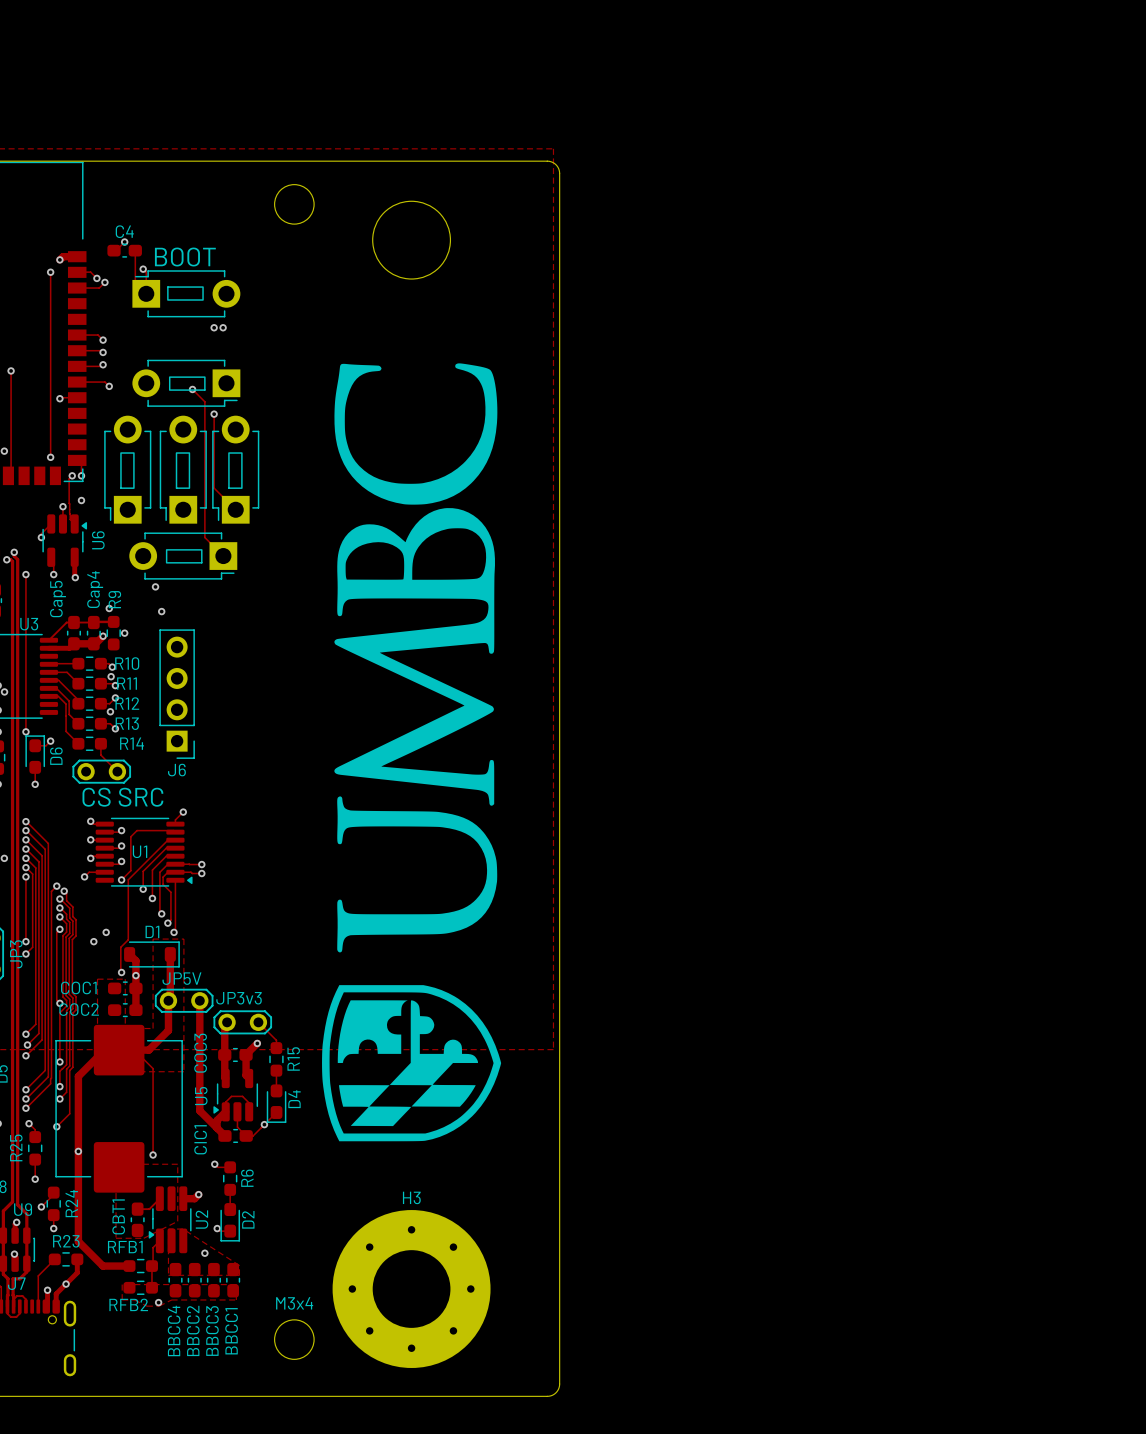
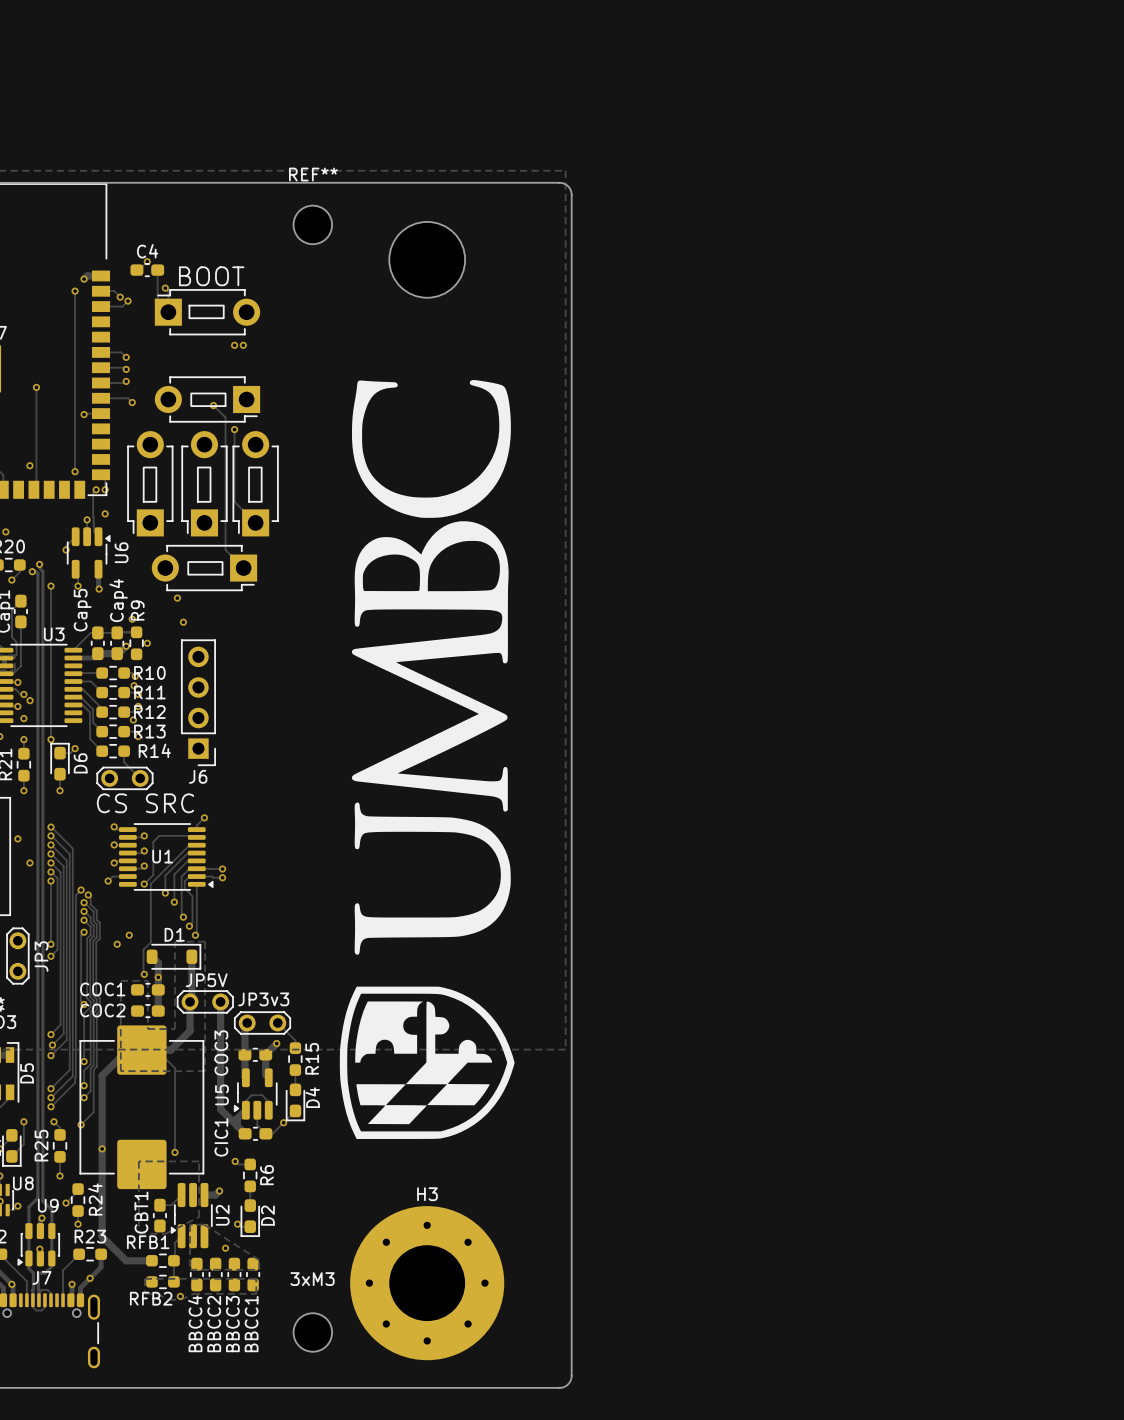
REF** name: none -> REF** (313, 174)
M3x4 name: M3x4 (294, 1303) -> 3xM3 (312, 1279)

